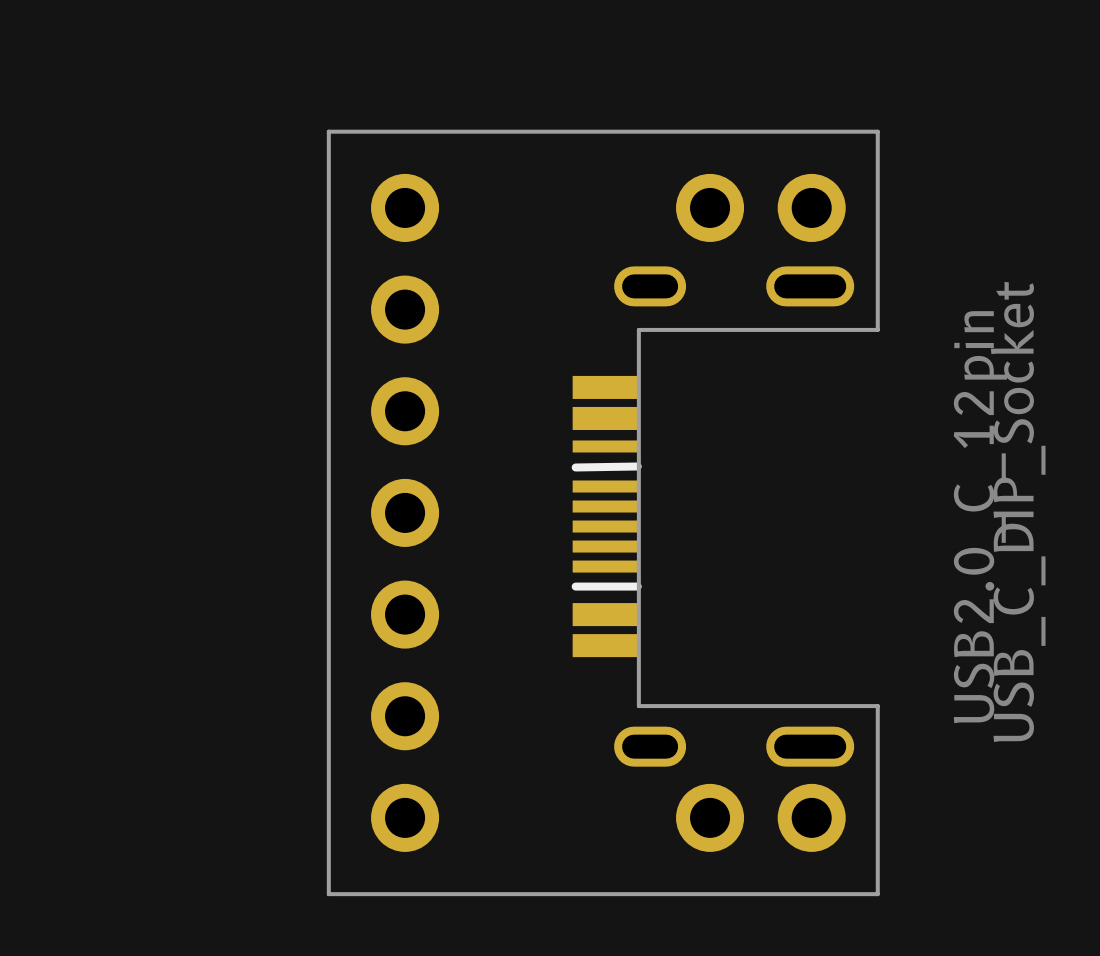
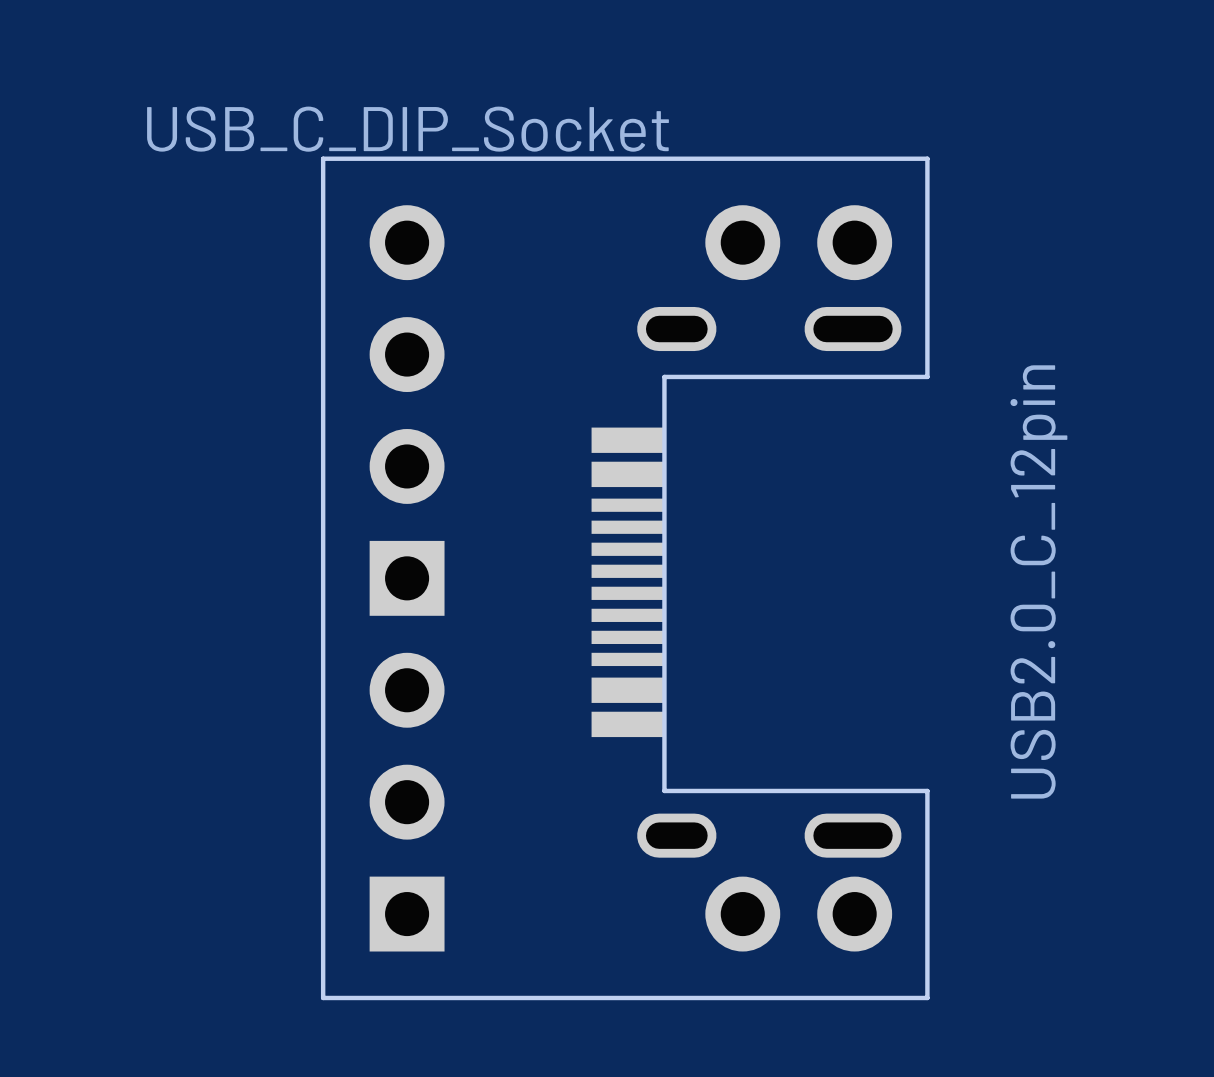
part footprint: [571, 266, 855, 767] -> [591, 306, 902, 858]
part: none -> USB_C_DIP_Socket (407, 578)
part: USB_C_DIP_Socket (608, 512) -> none

